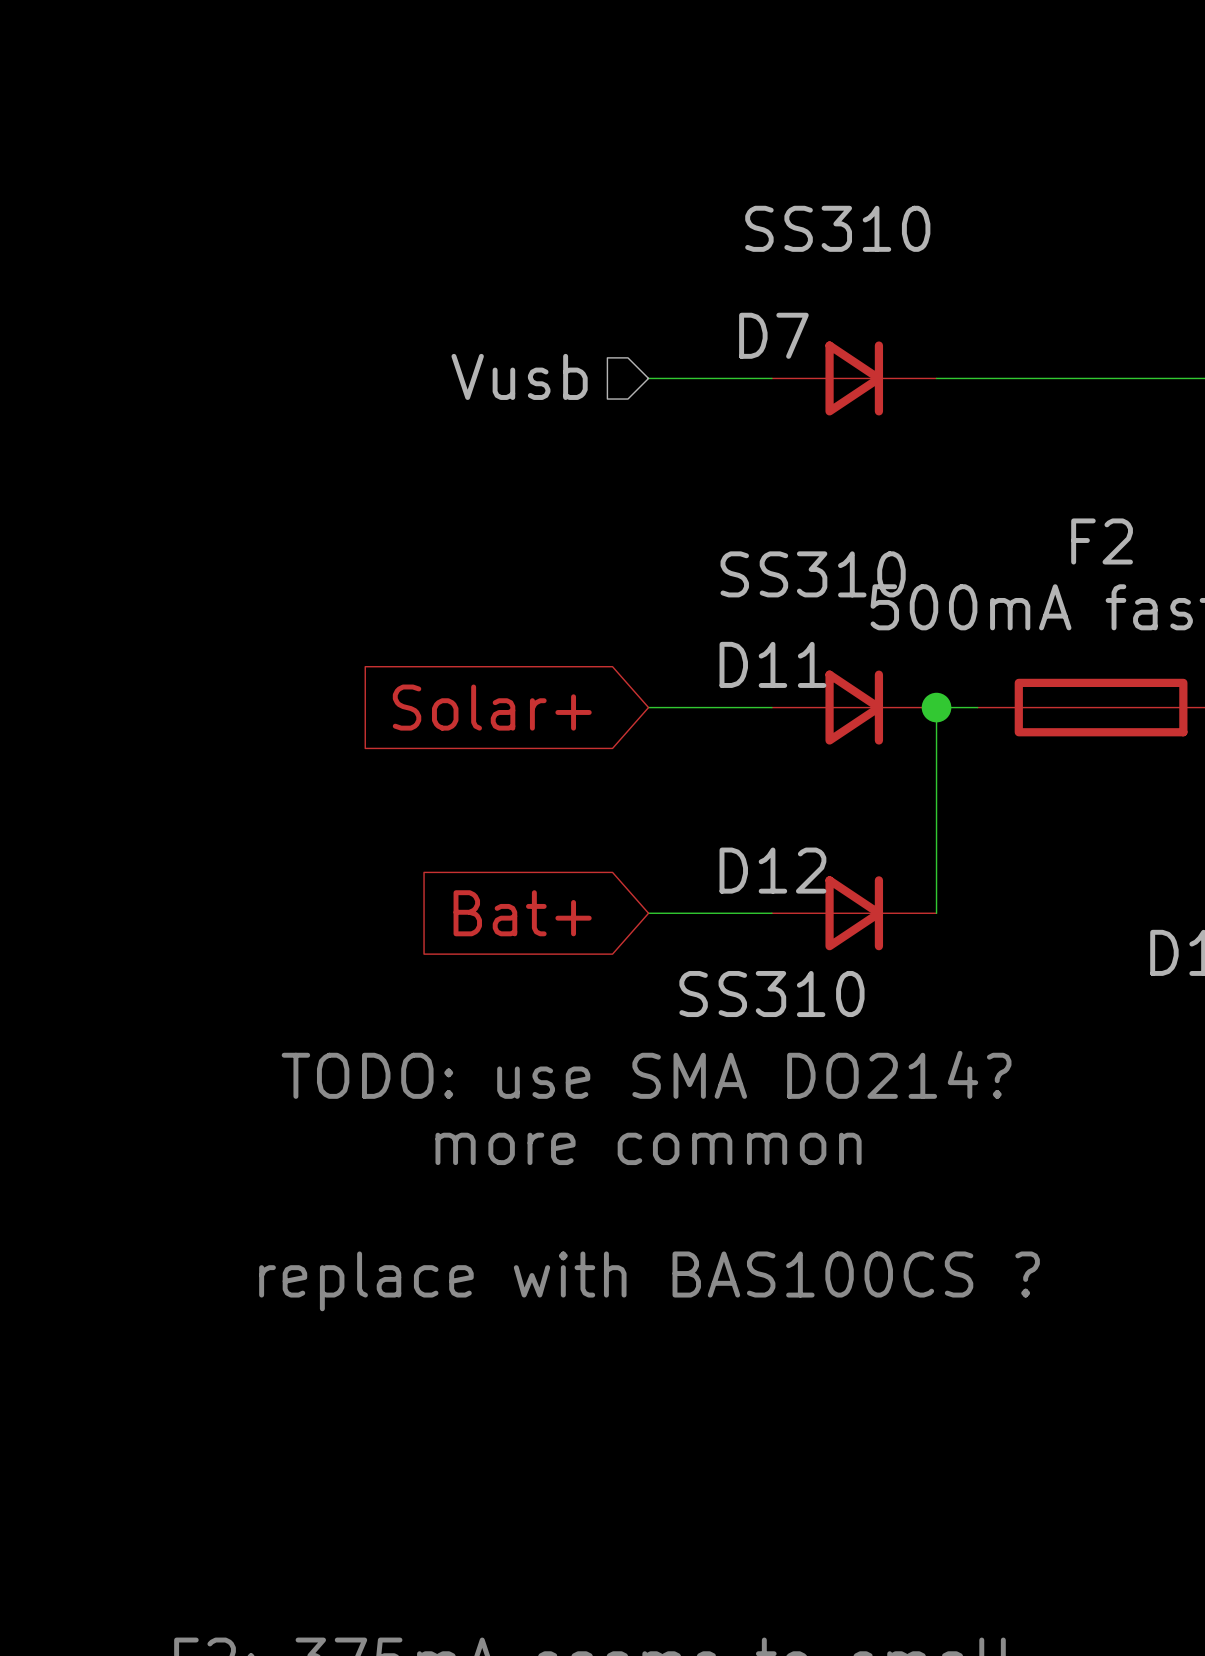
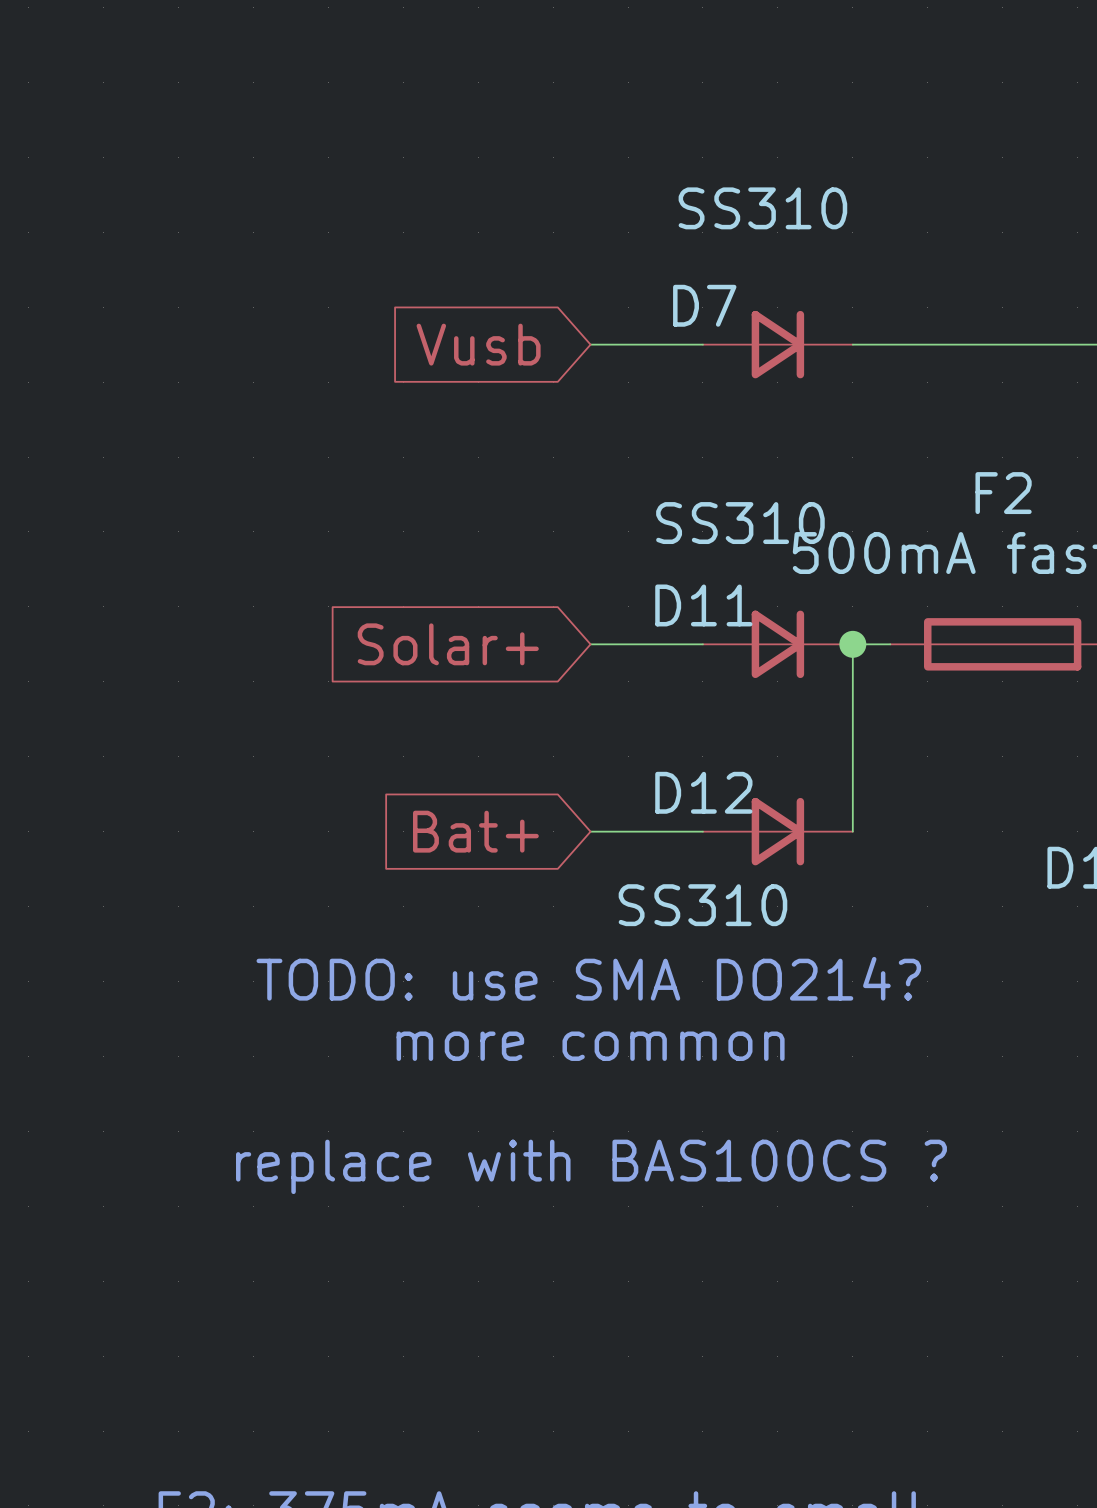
hierarchical label: Vusb (519, 376) -> none
global label: none -> Vusb (478, 344)

